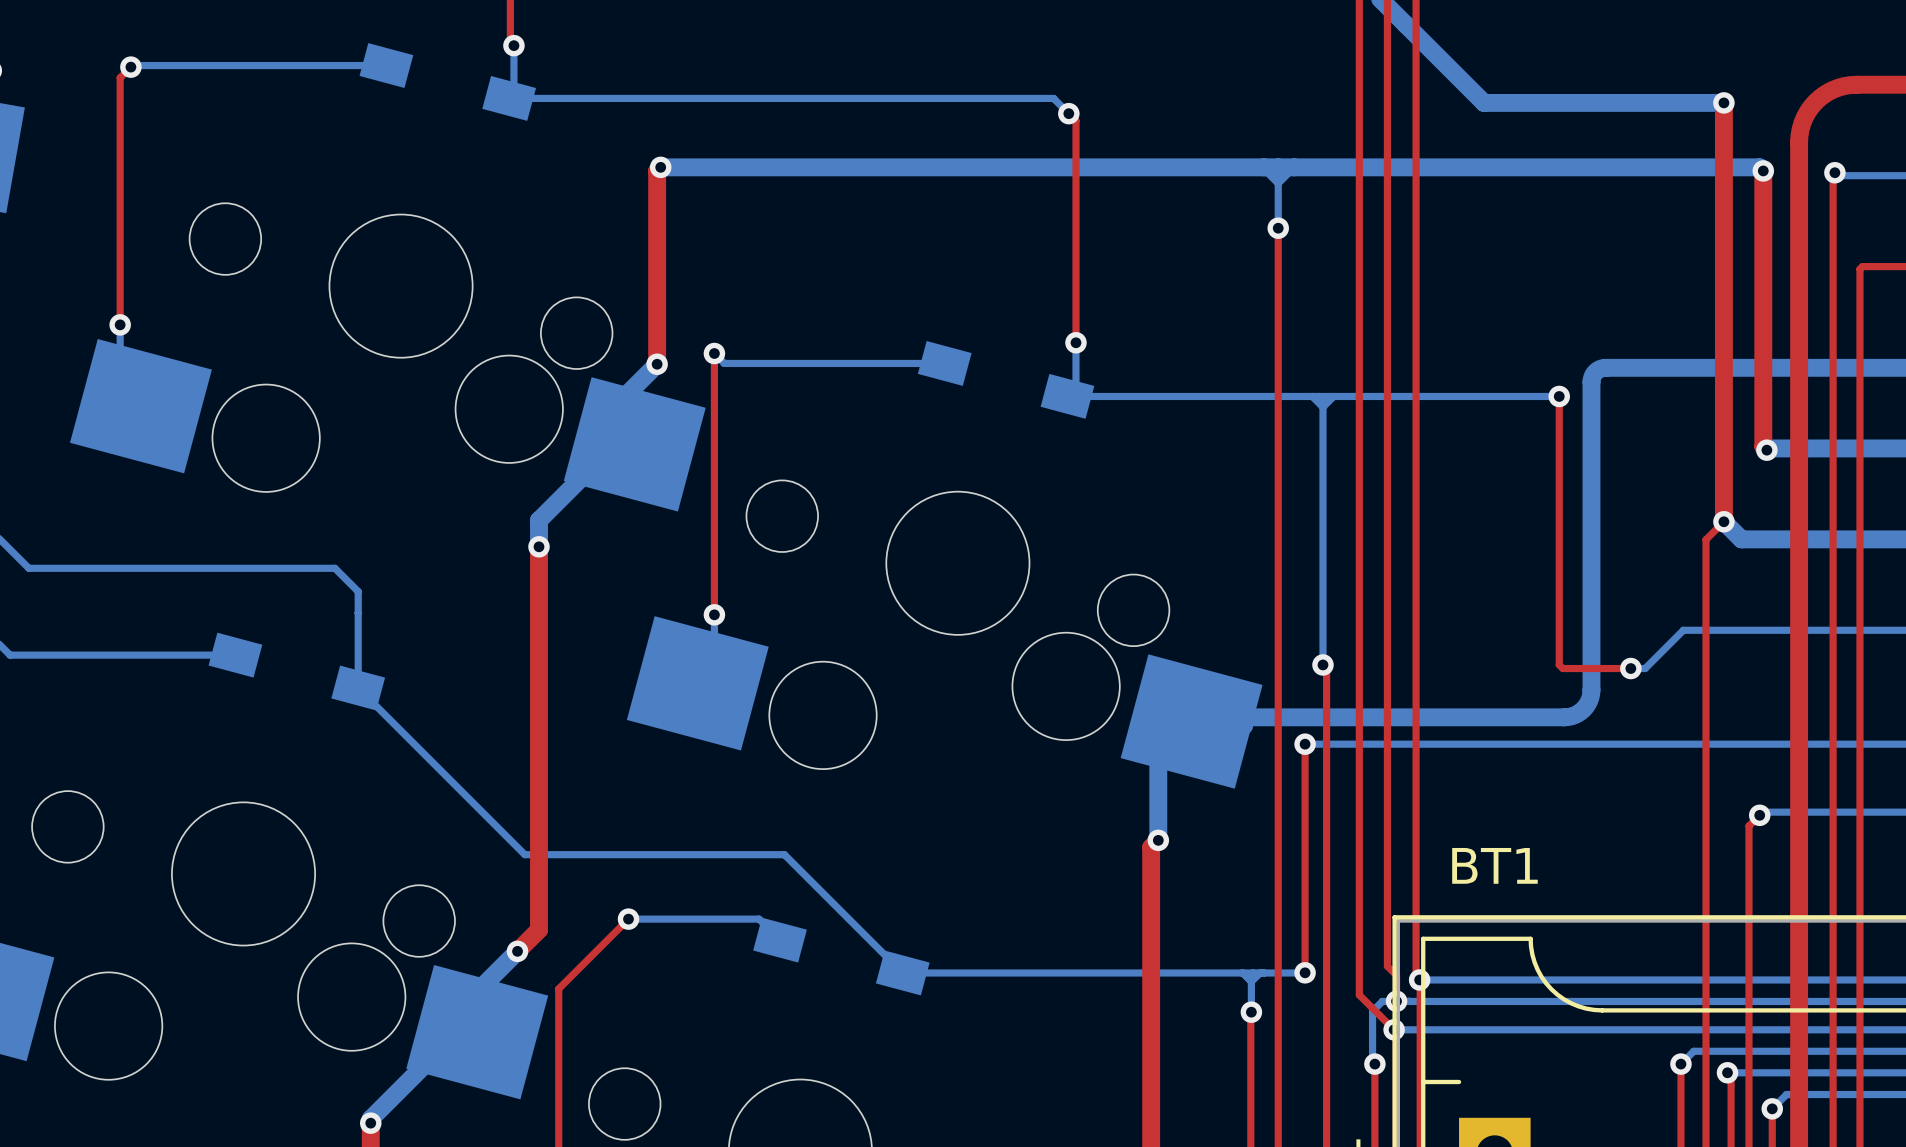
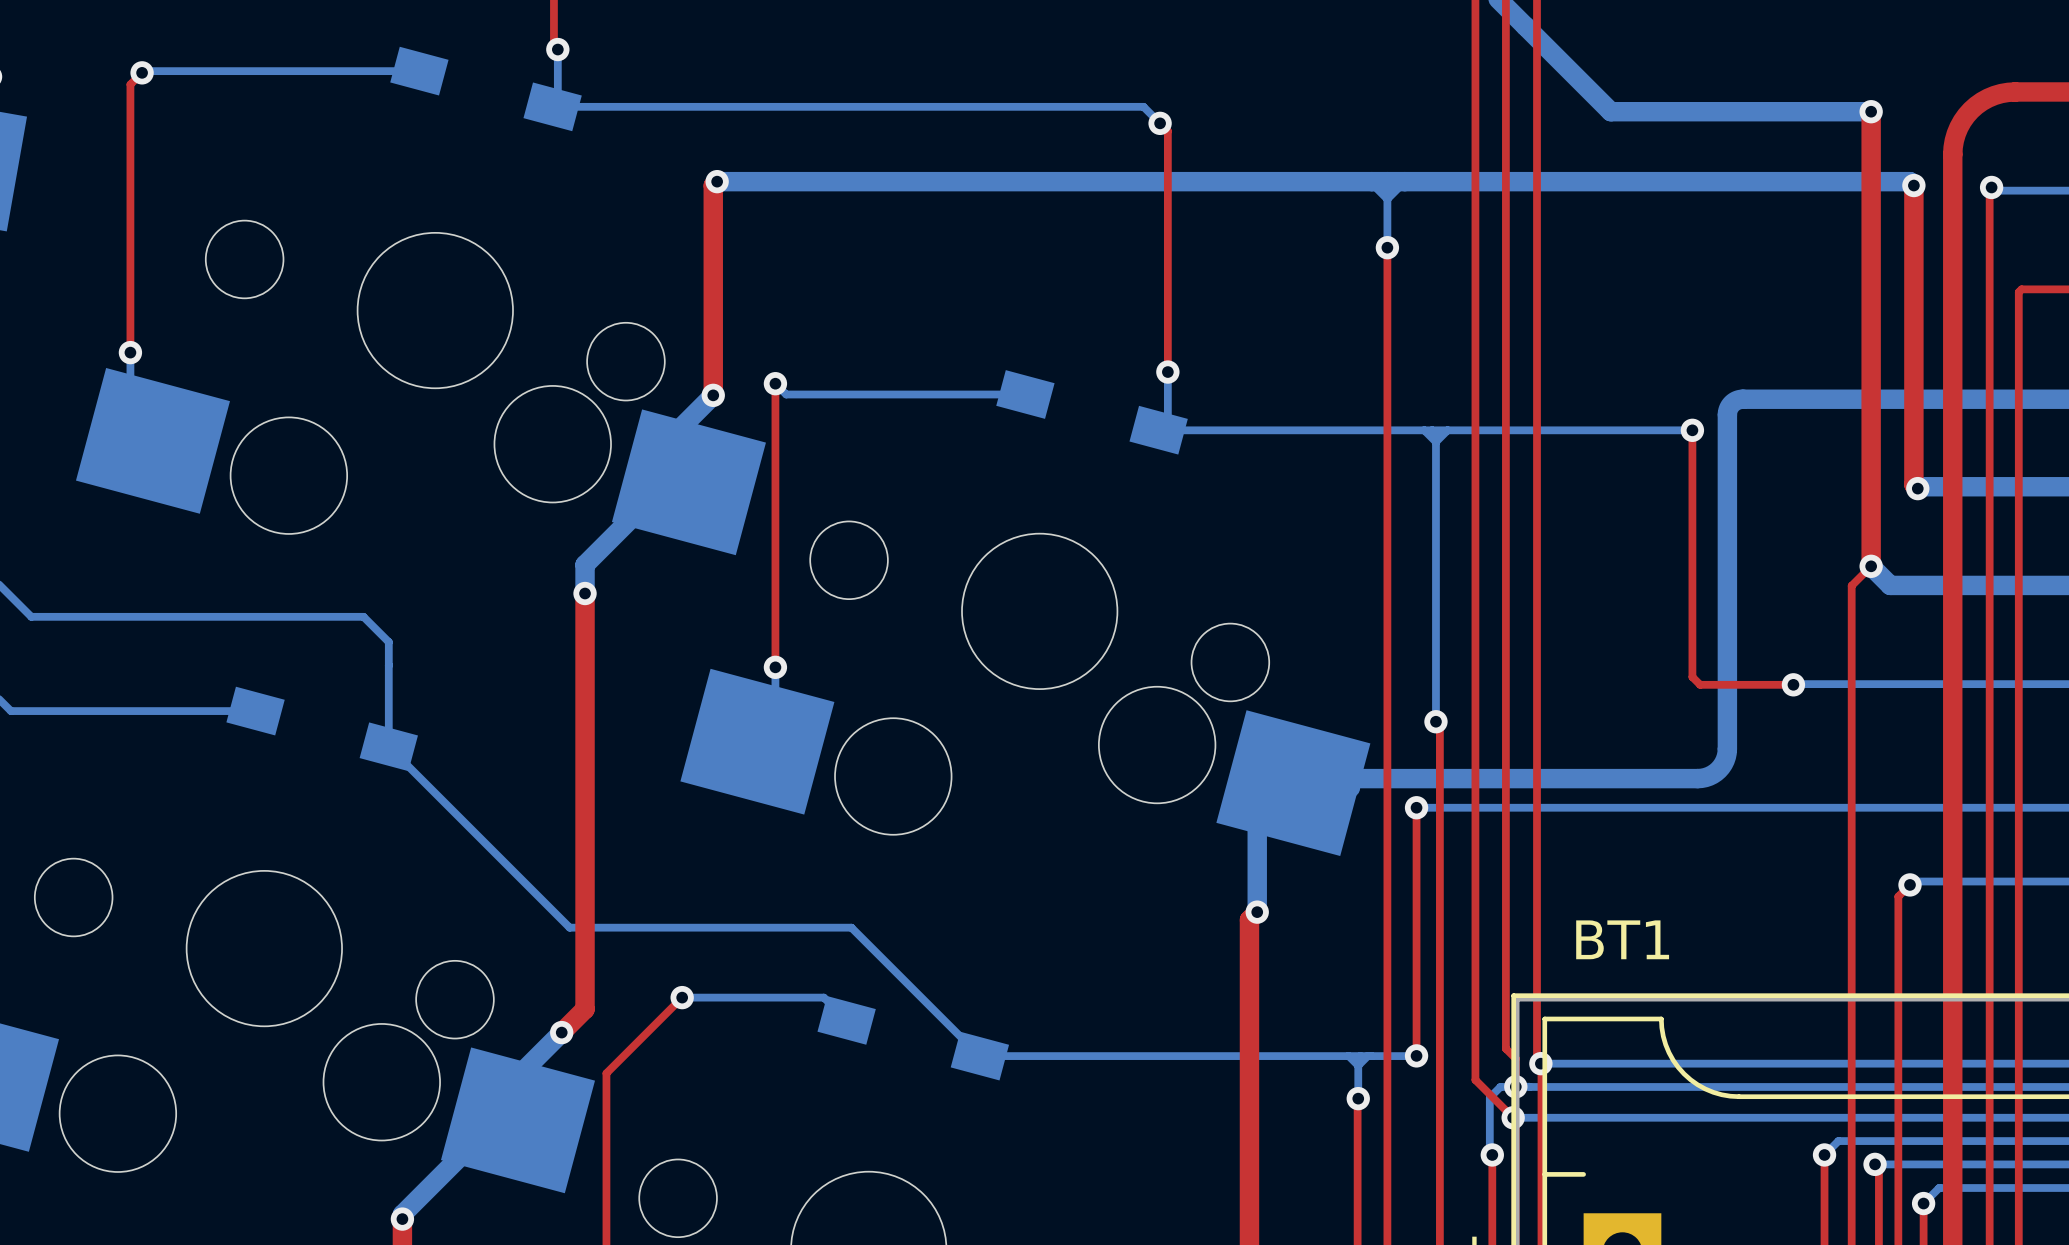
top track: (1559, 623) (1559, 664) (1562, 668) (1630, 668) -> (1692, 677) (1700, 684) (1793, 684)
bottom track: (1683, 630) (1645, 668) (1630, 668) -> (1827, 684) (1793, 684)
via position: (1630, 668) -> (1793, 684)

